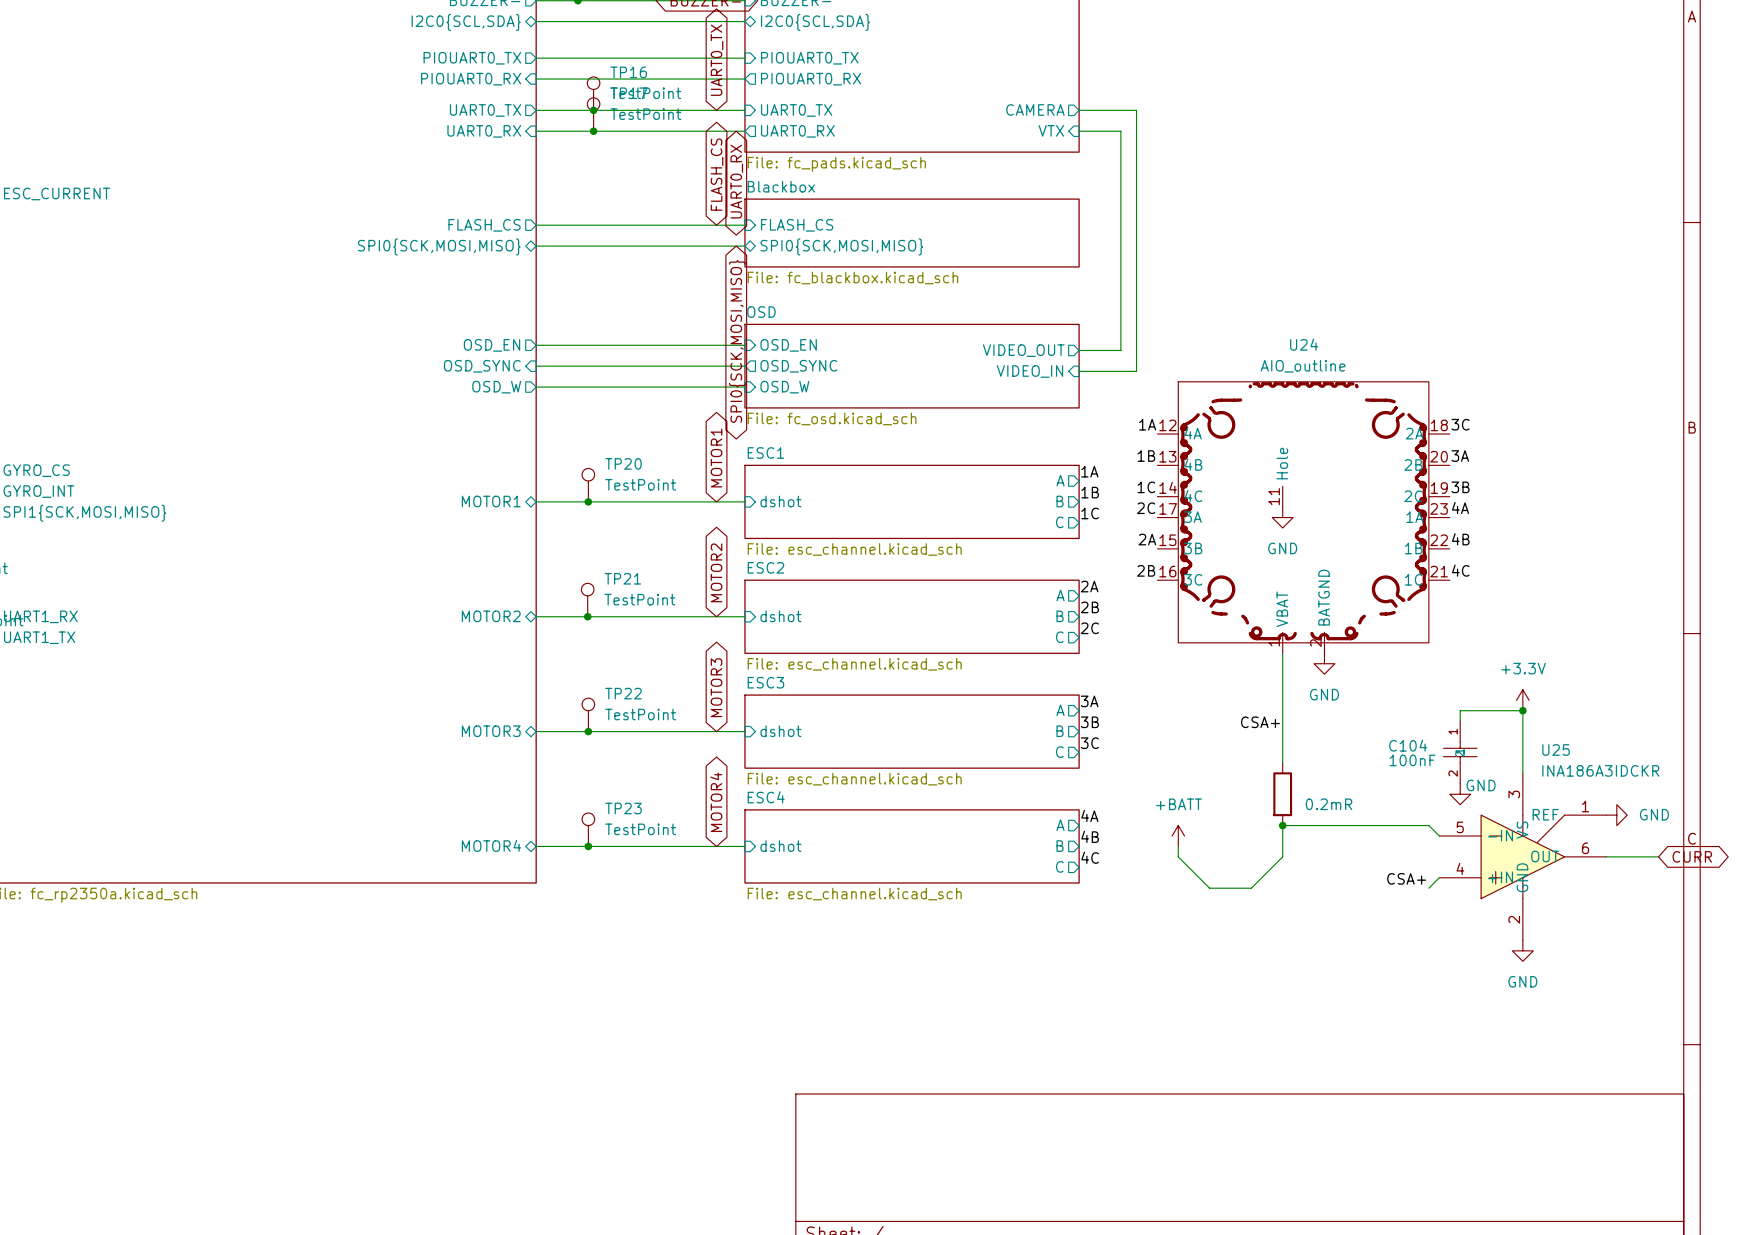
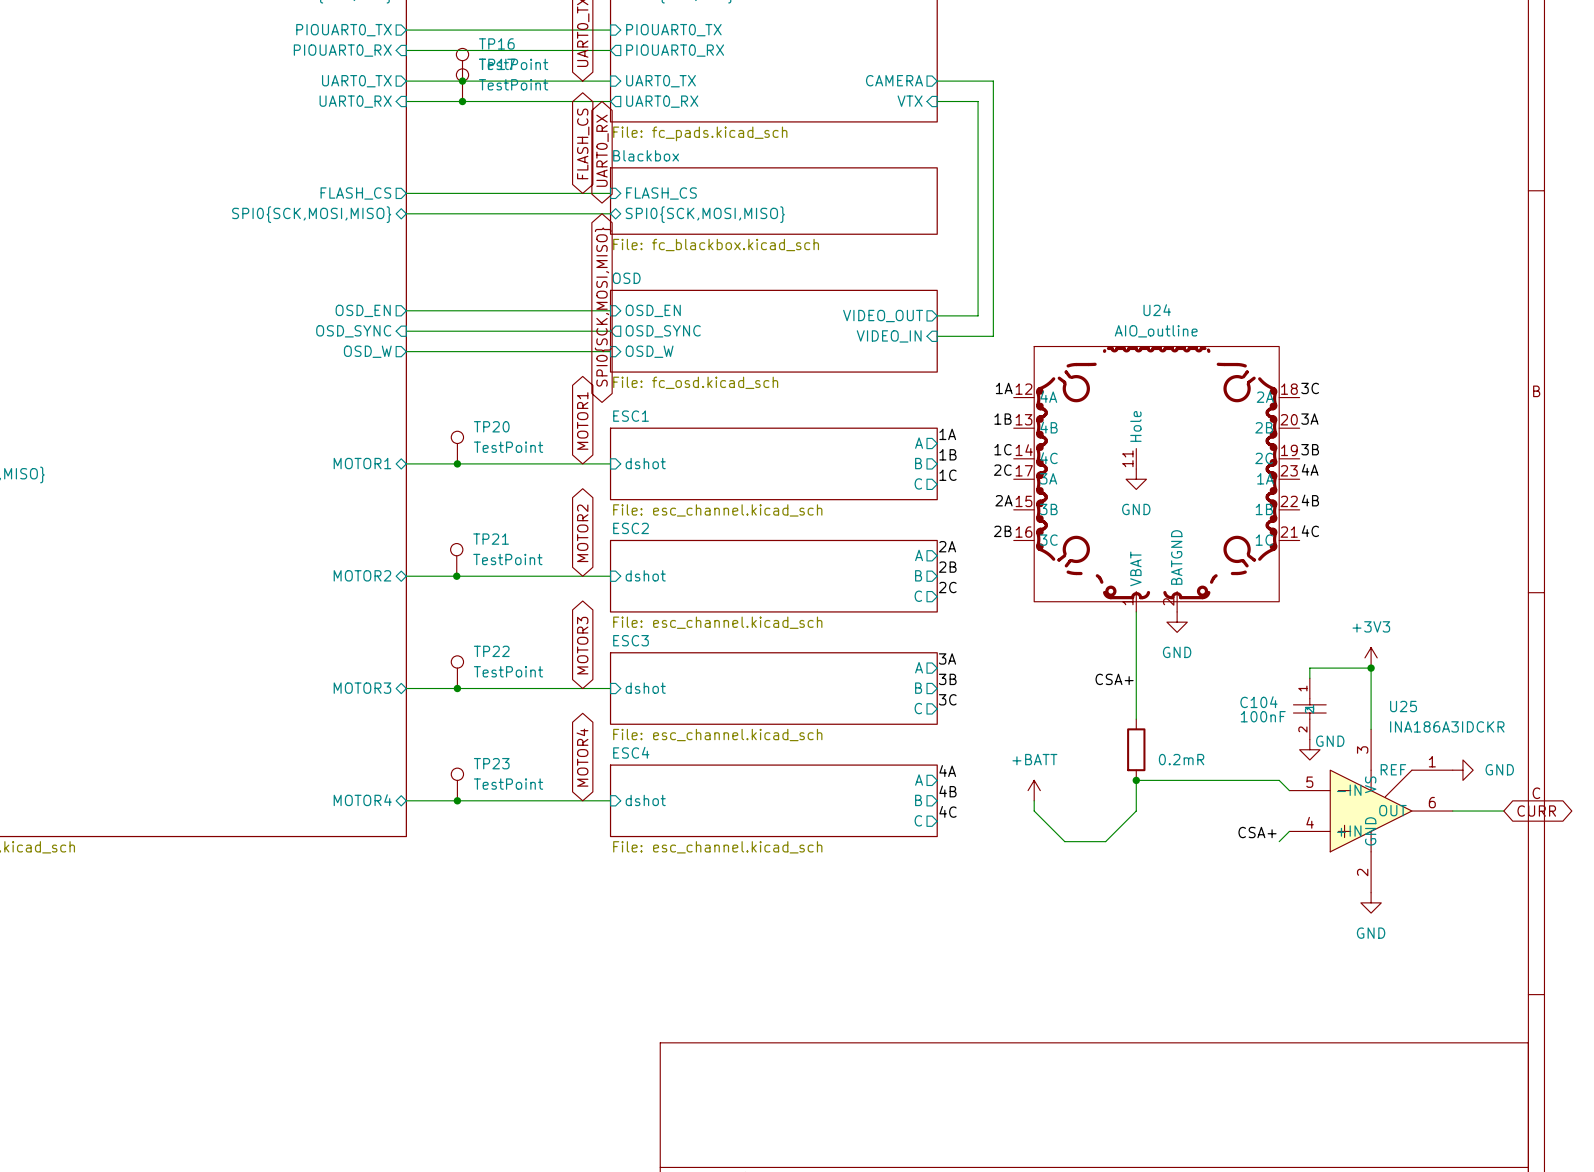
power symbol: +3.3V (1522, 700) -> +3V3 (1371, 657)

